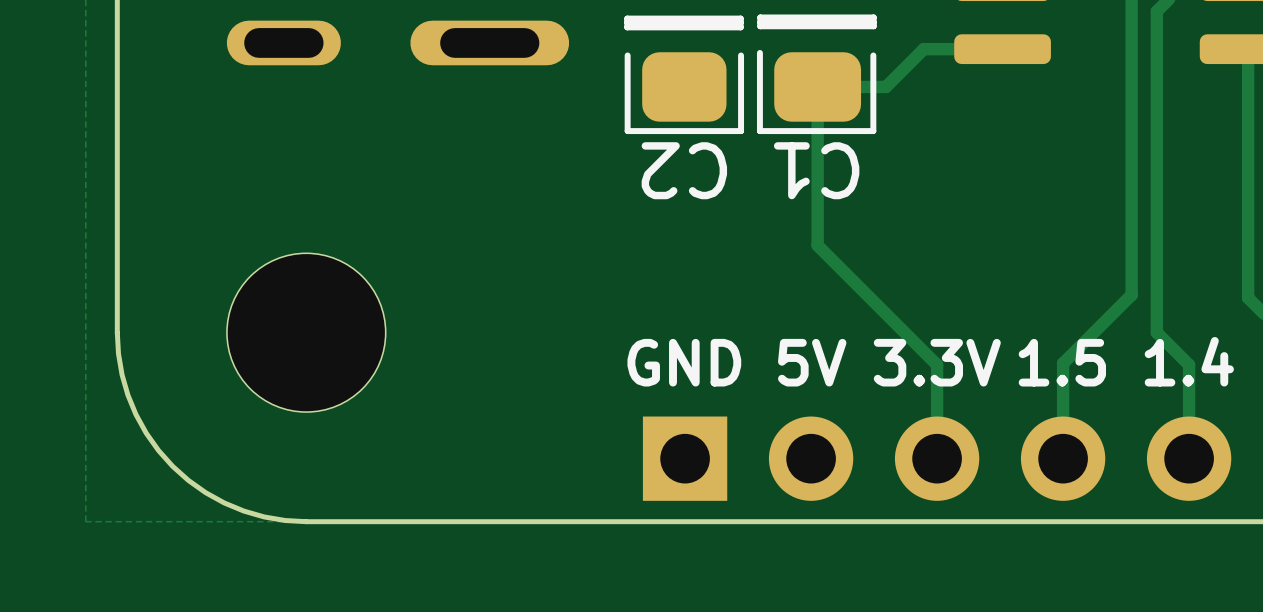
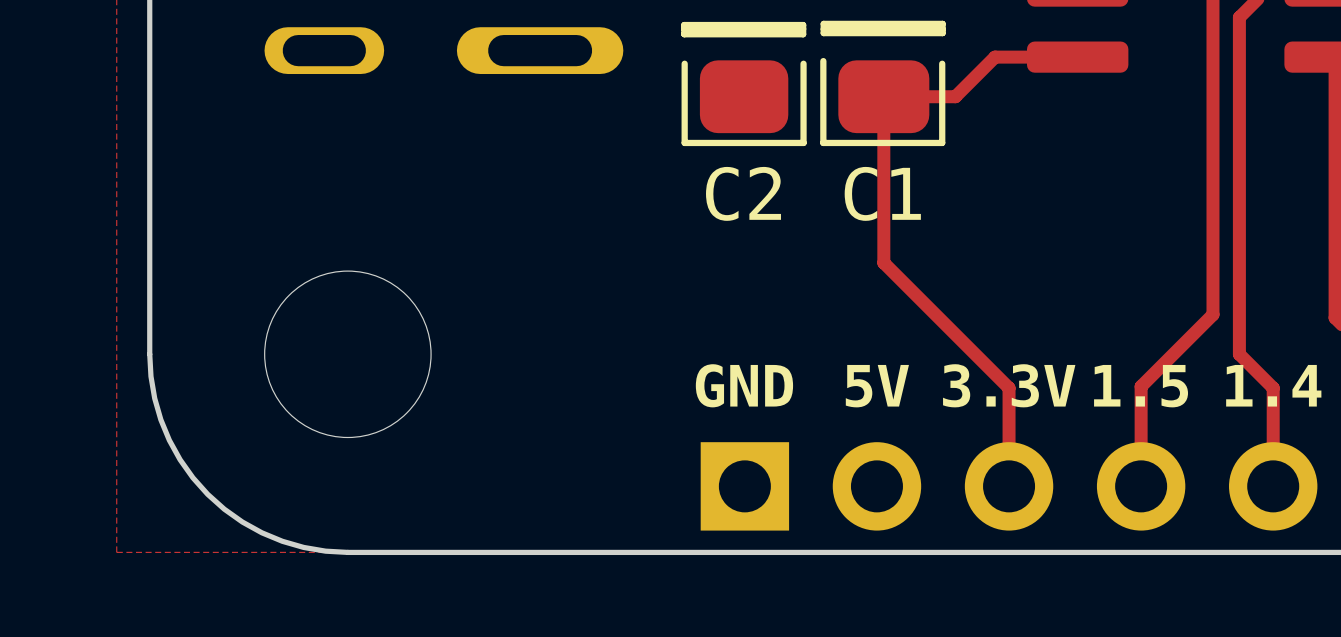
C2 name rotation: 0° (684, 170) -> 180° (743, 193)
C1 name rotation: 0° (816, 170) -> 180° (882, 193)

